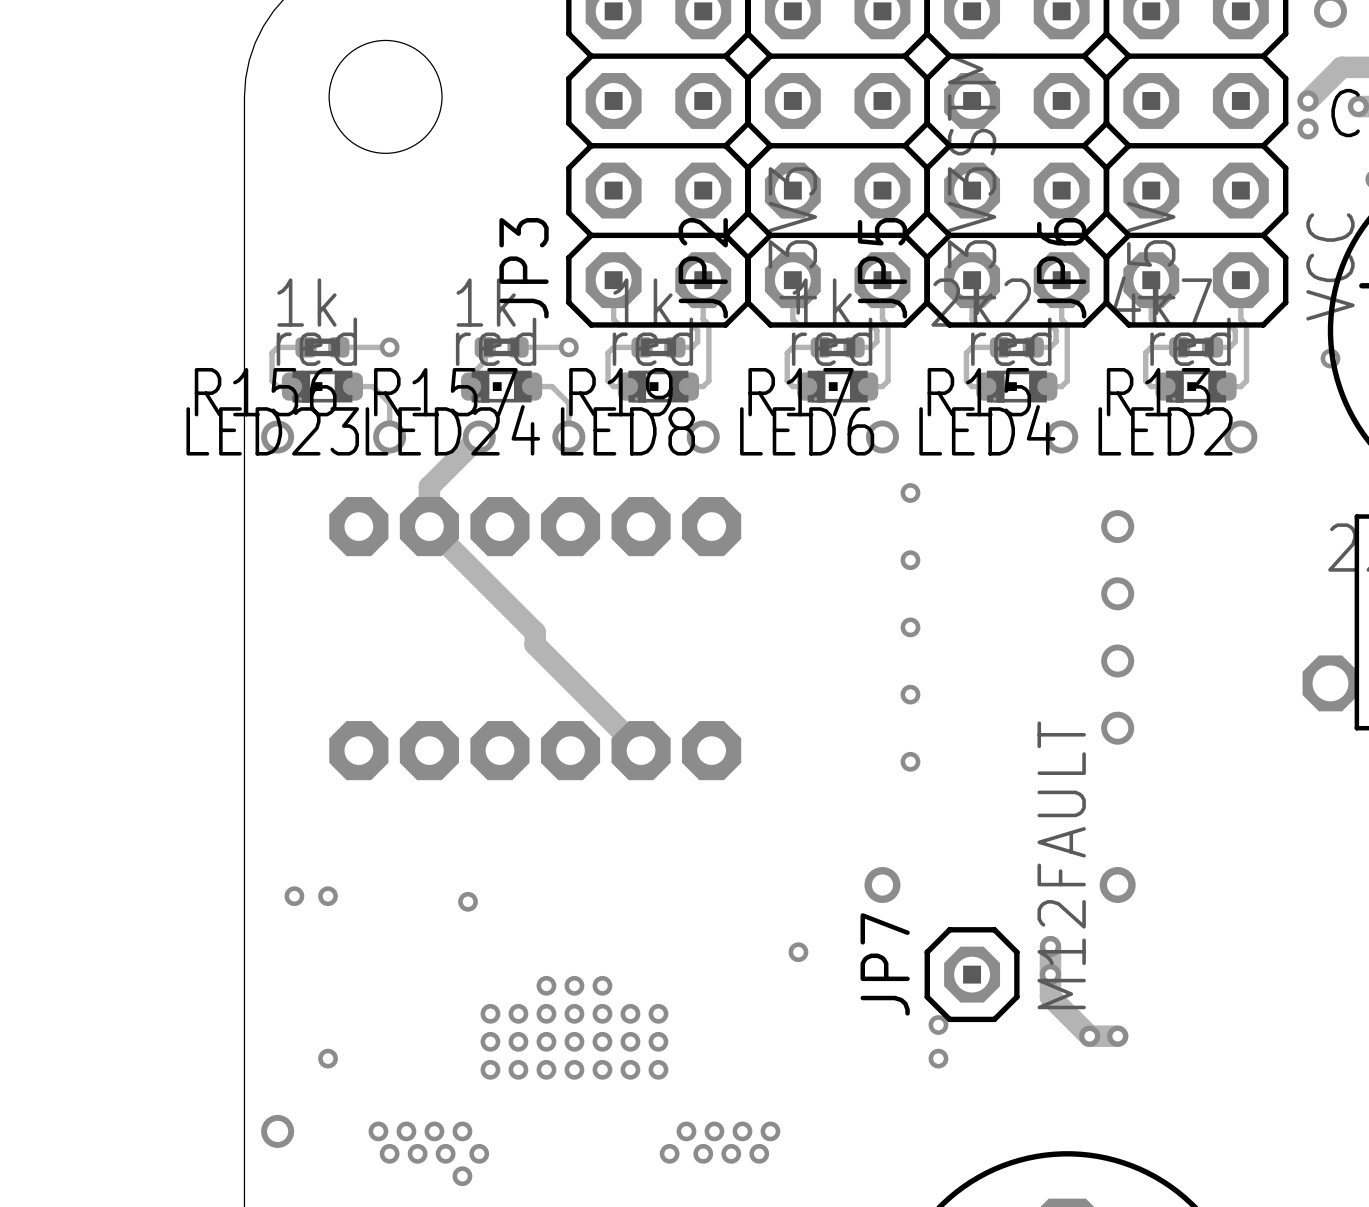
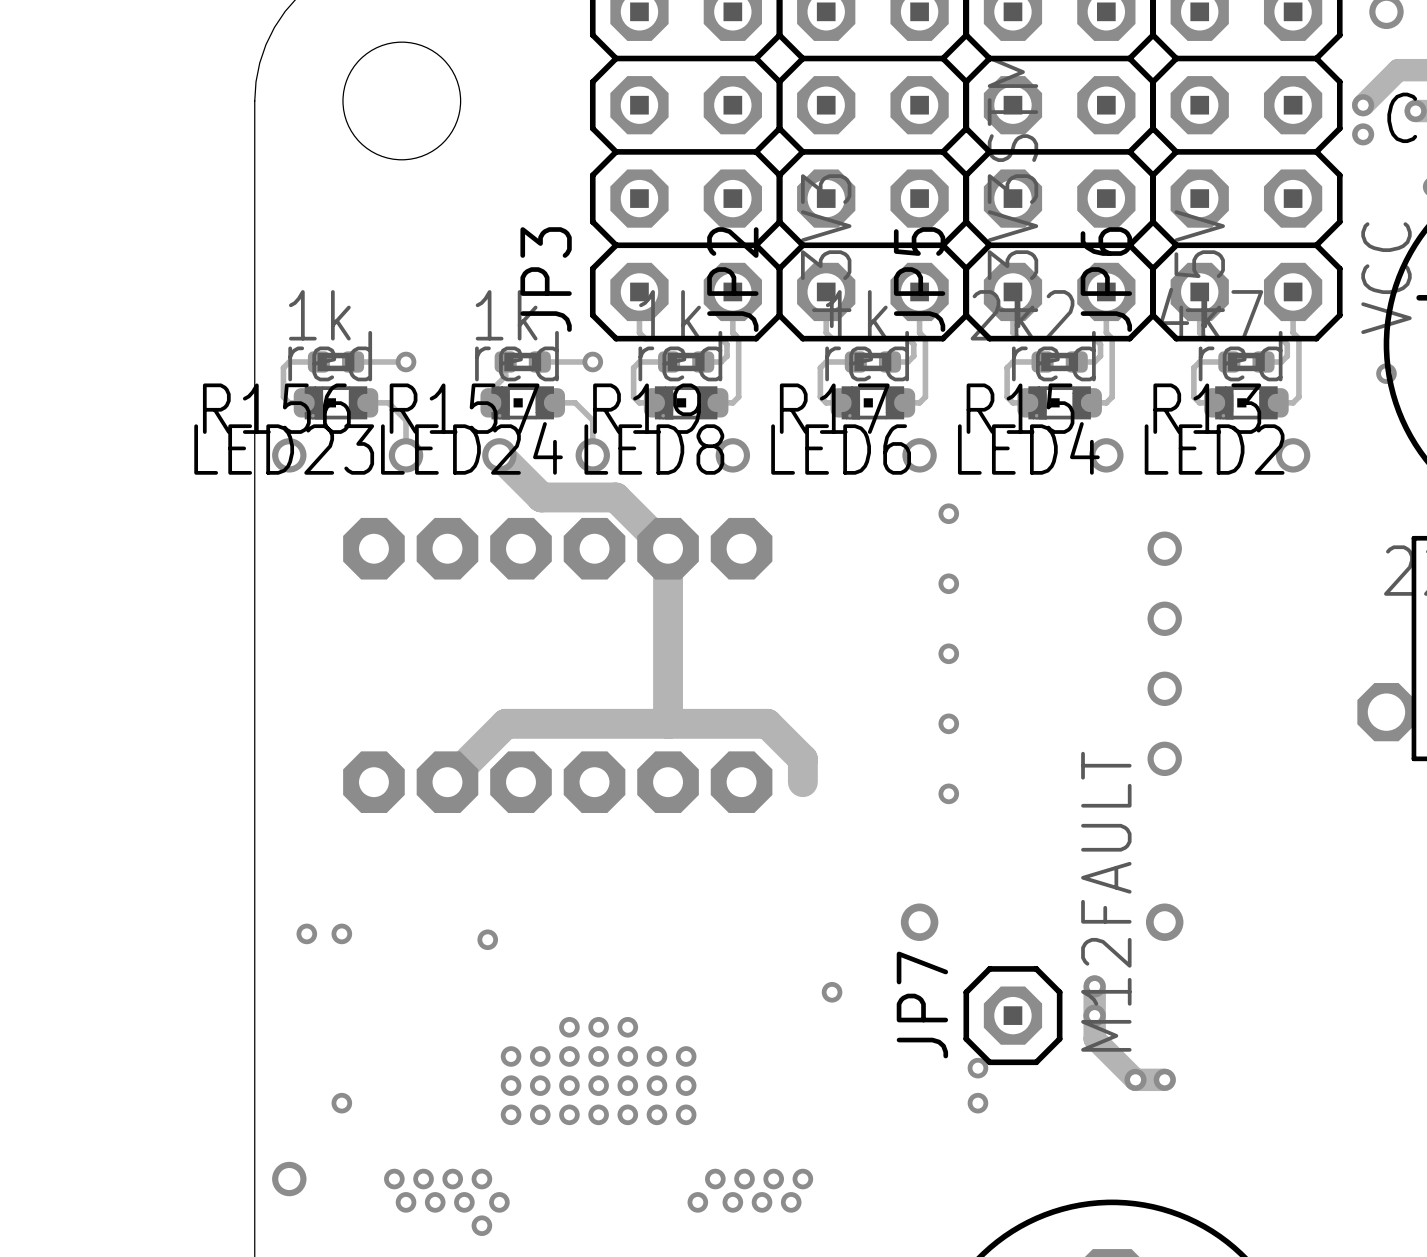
track: (479, 436) (429, 486) (429, 526) (535, 632) (535, 644) (641, 750) -> (499, 455) (541, 497) (615, 497) (668, 548) (668, 723)
track: none -> (802, 782) (802, 759) (767, 723) (505, 723) (447, 782)

